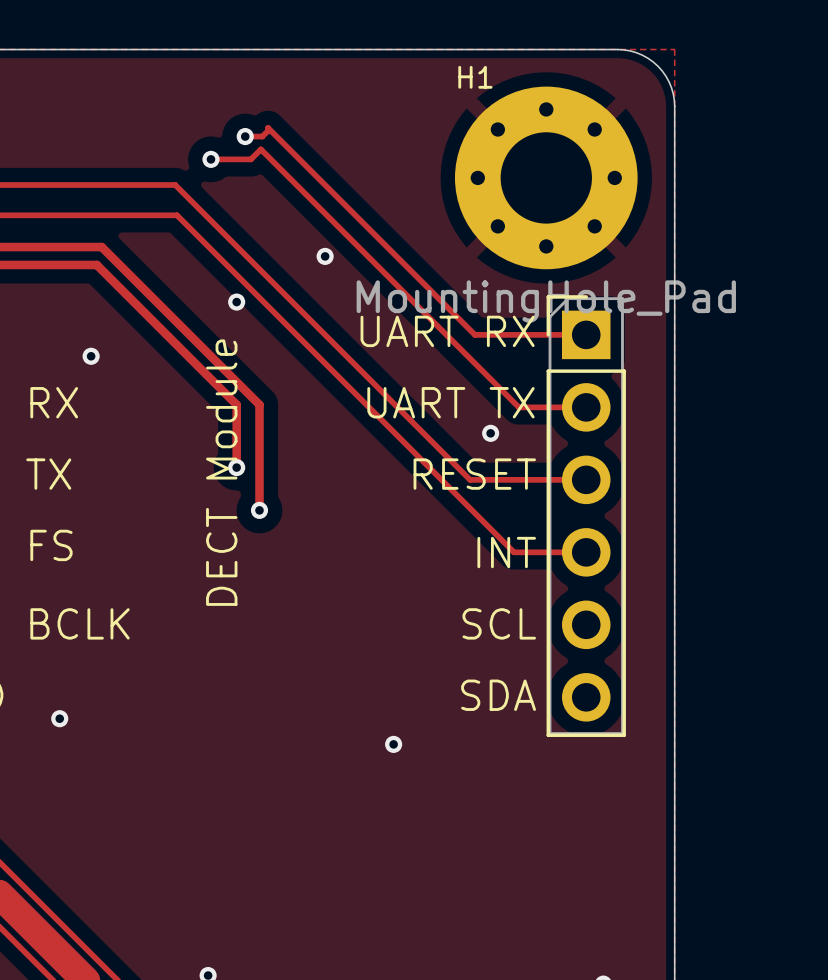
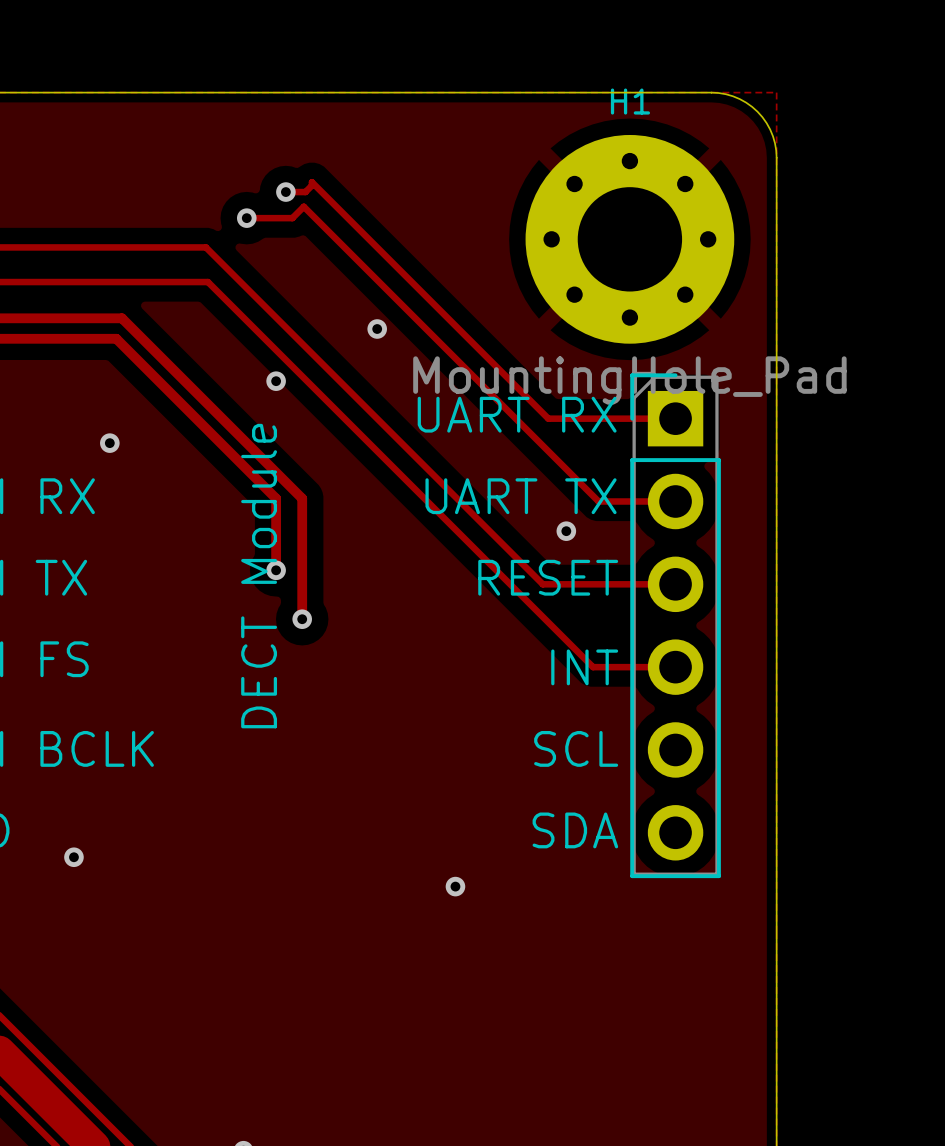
H1 name position: H1 (475, 77) -> H1 (630, 101)

